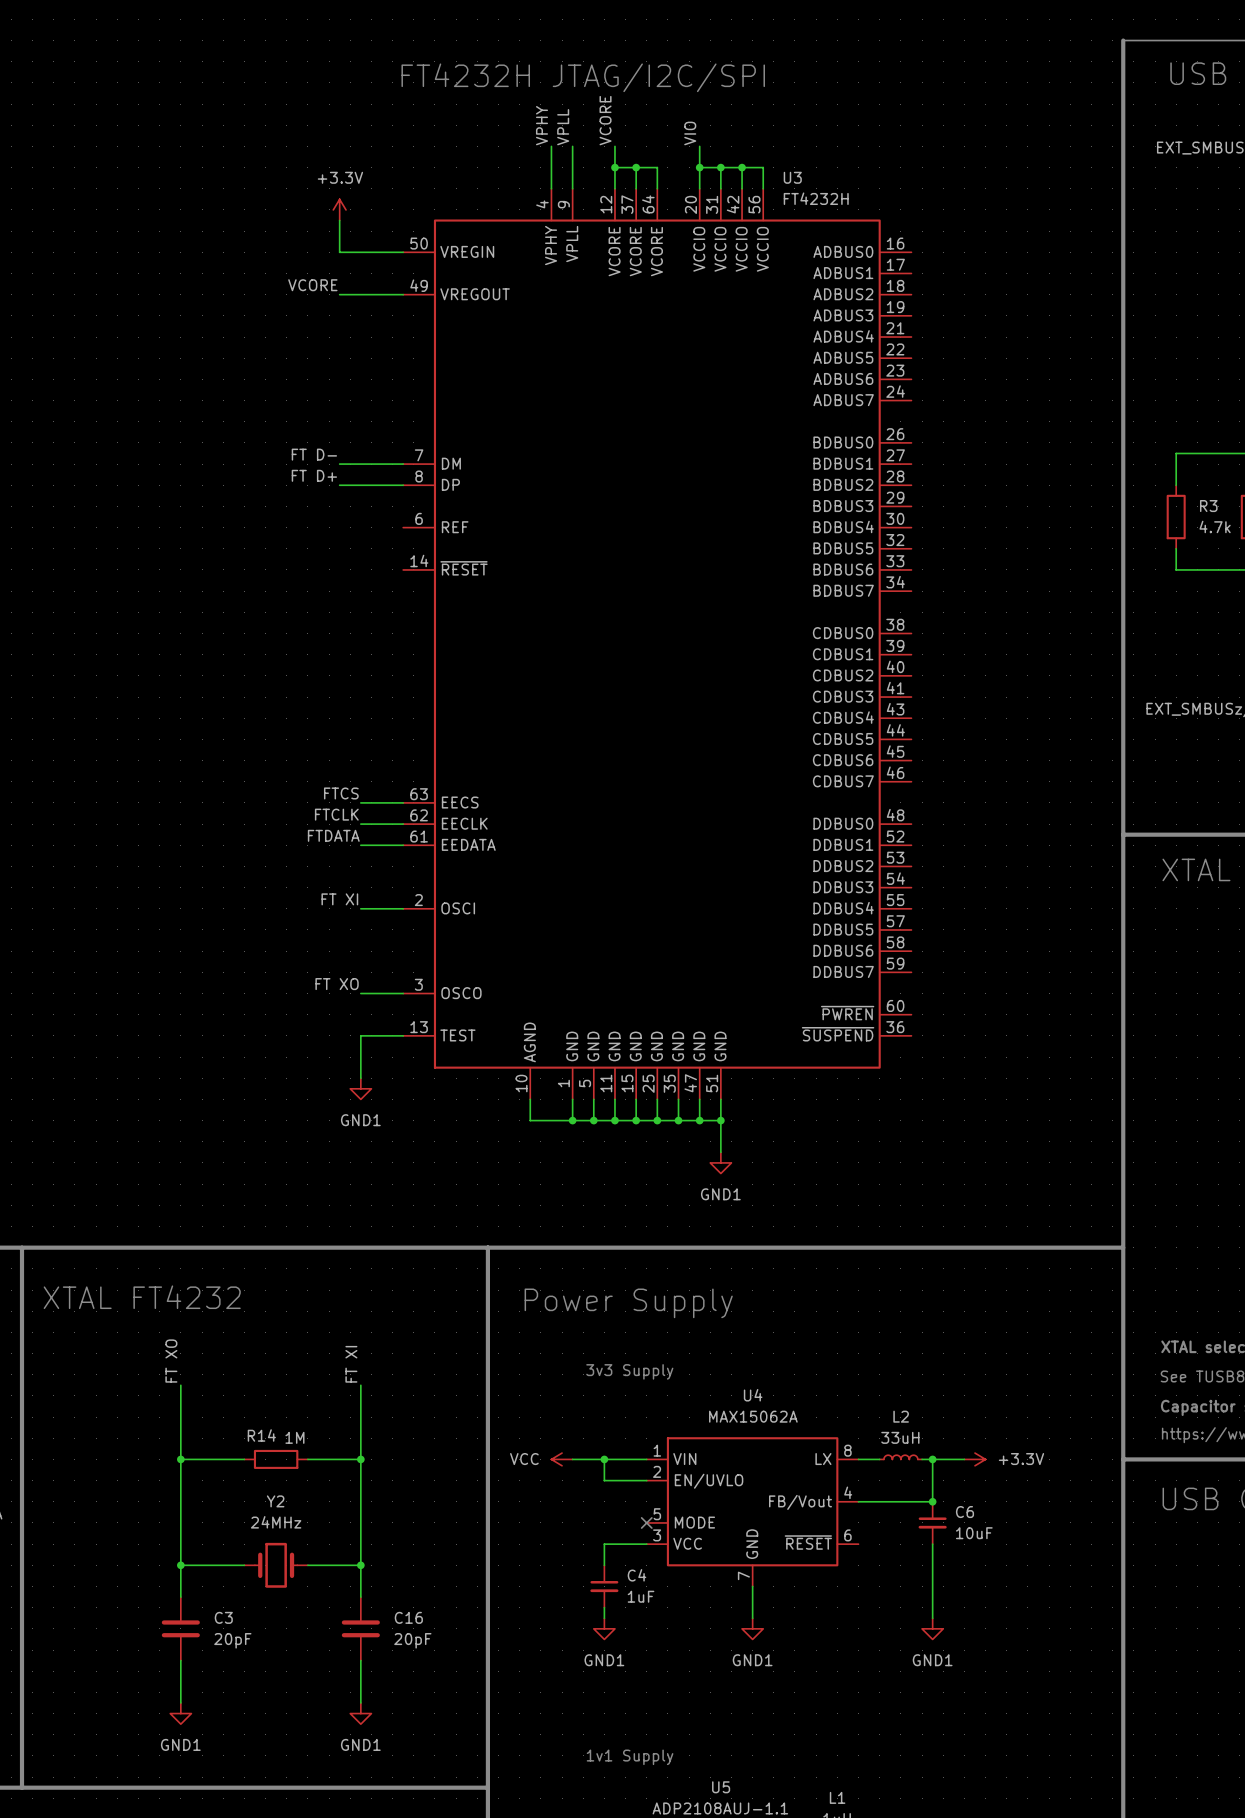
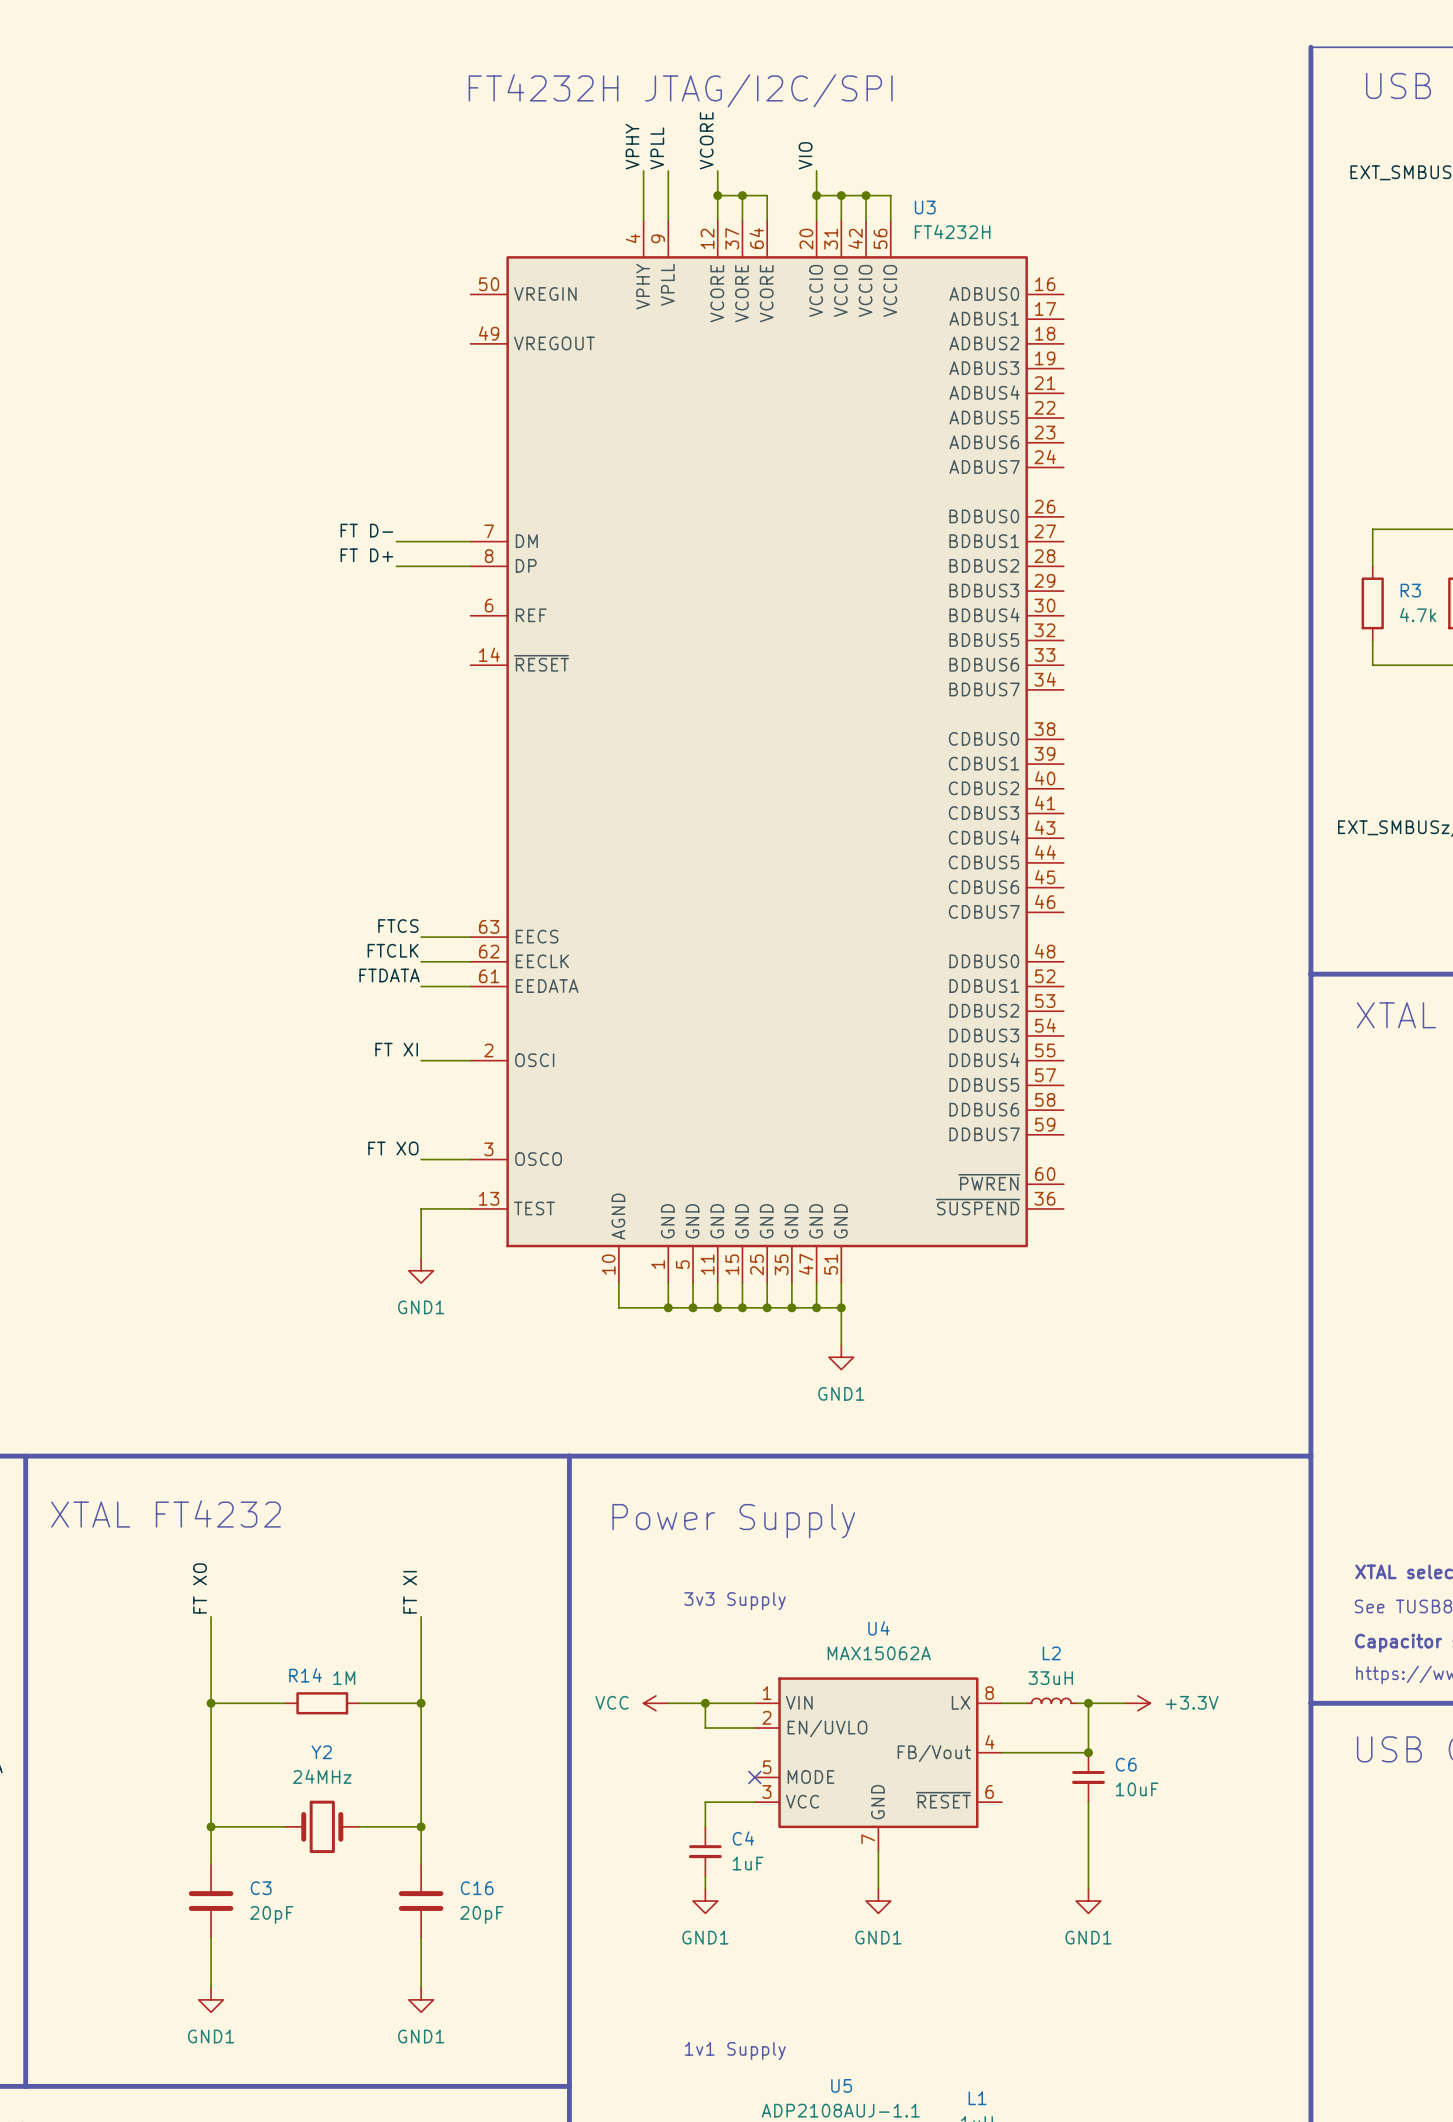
power symbol: +3.3V (339, 209) -> none
wire: (339, 220) (339, 252) (403, 252) -> none
label: VCORE (312, 285) -> none
wire: (339, 294) (403, 294) -> none

